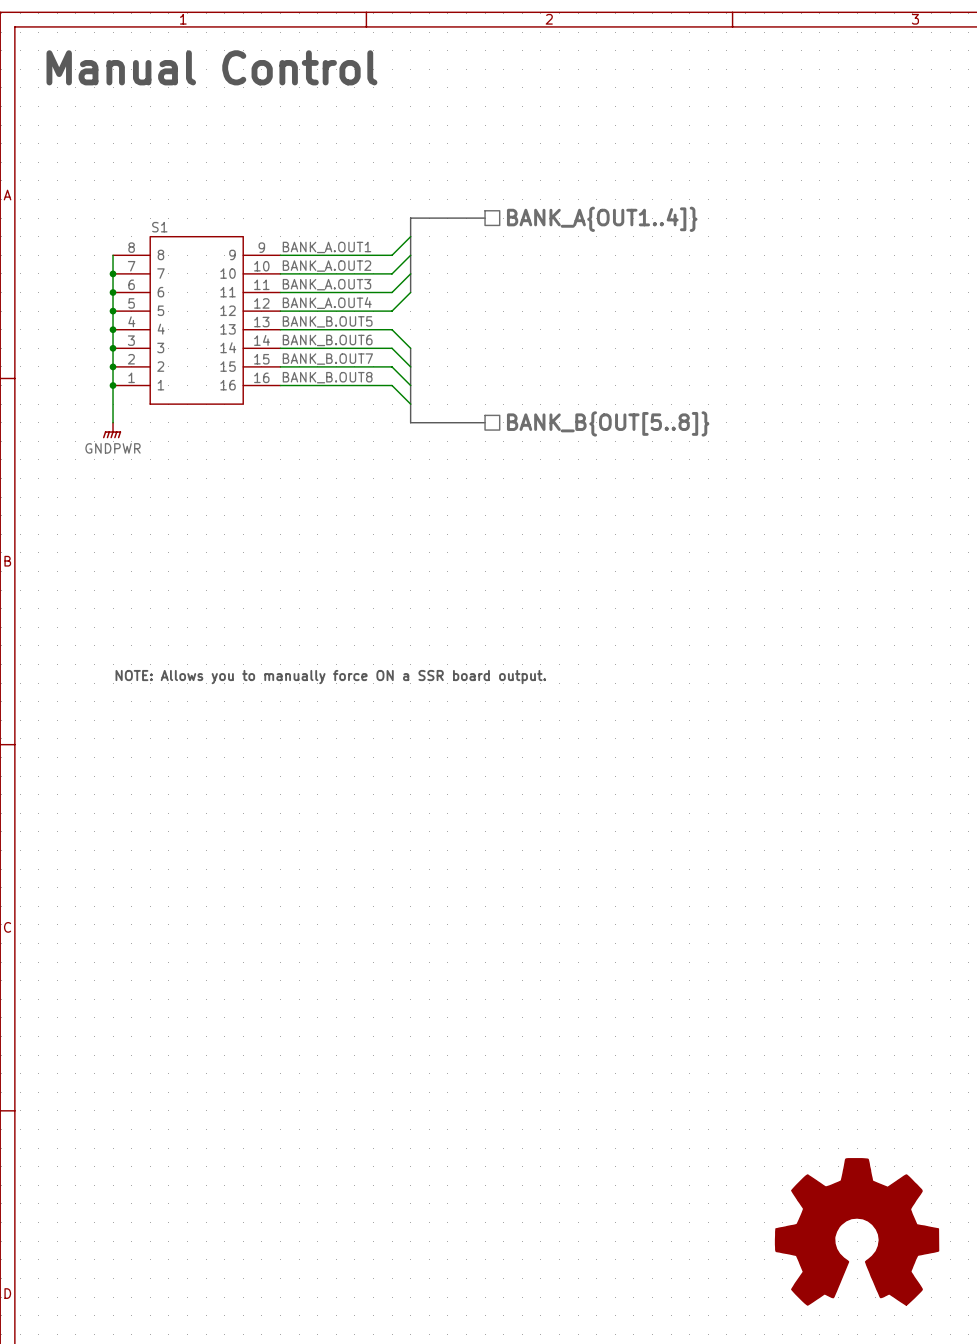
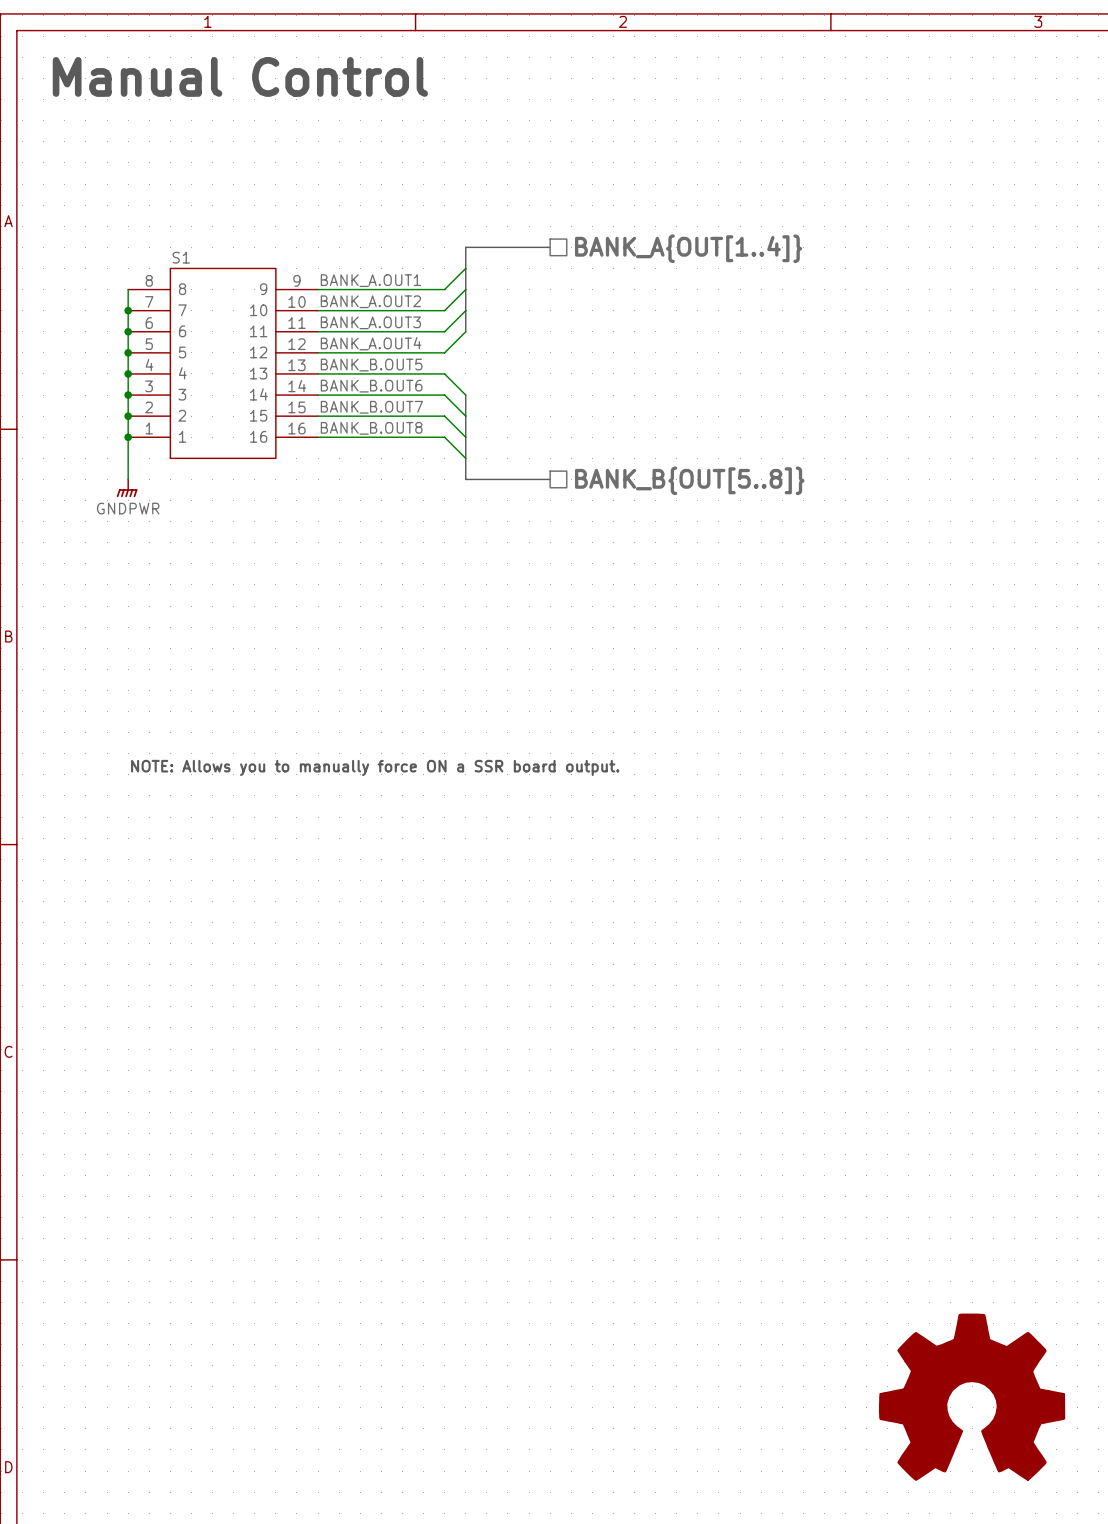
hierarchical label: BANK_A{OUT1..4]} (602, 219) -> BANK_A{OUT[1..4]} (688, 248)

